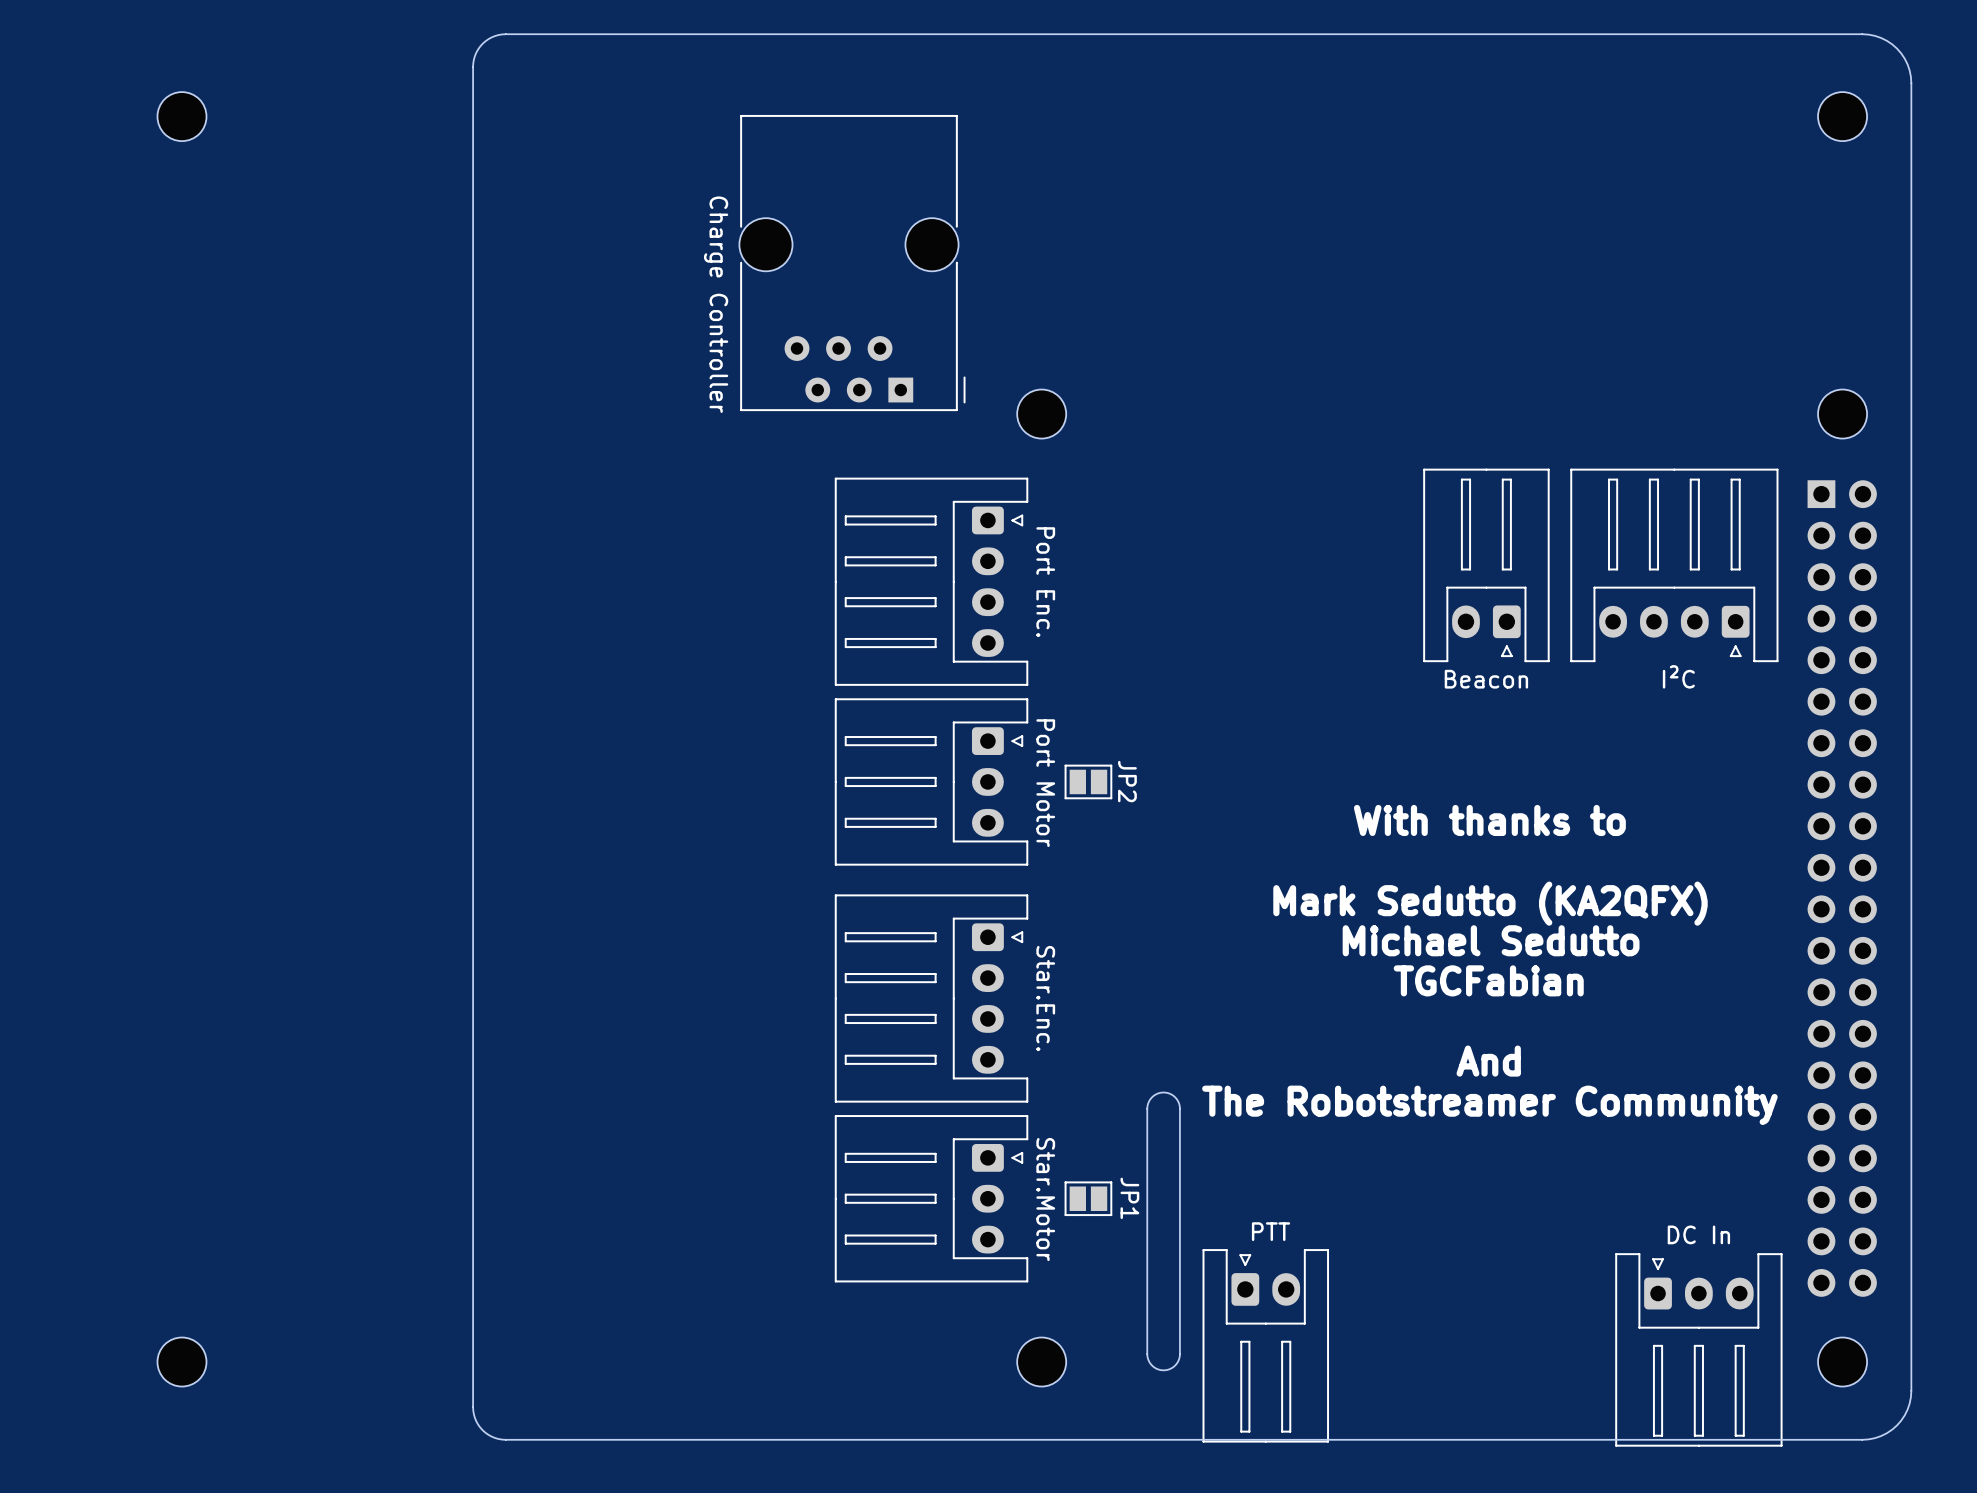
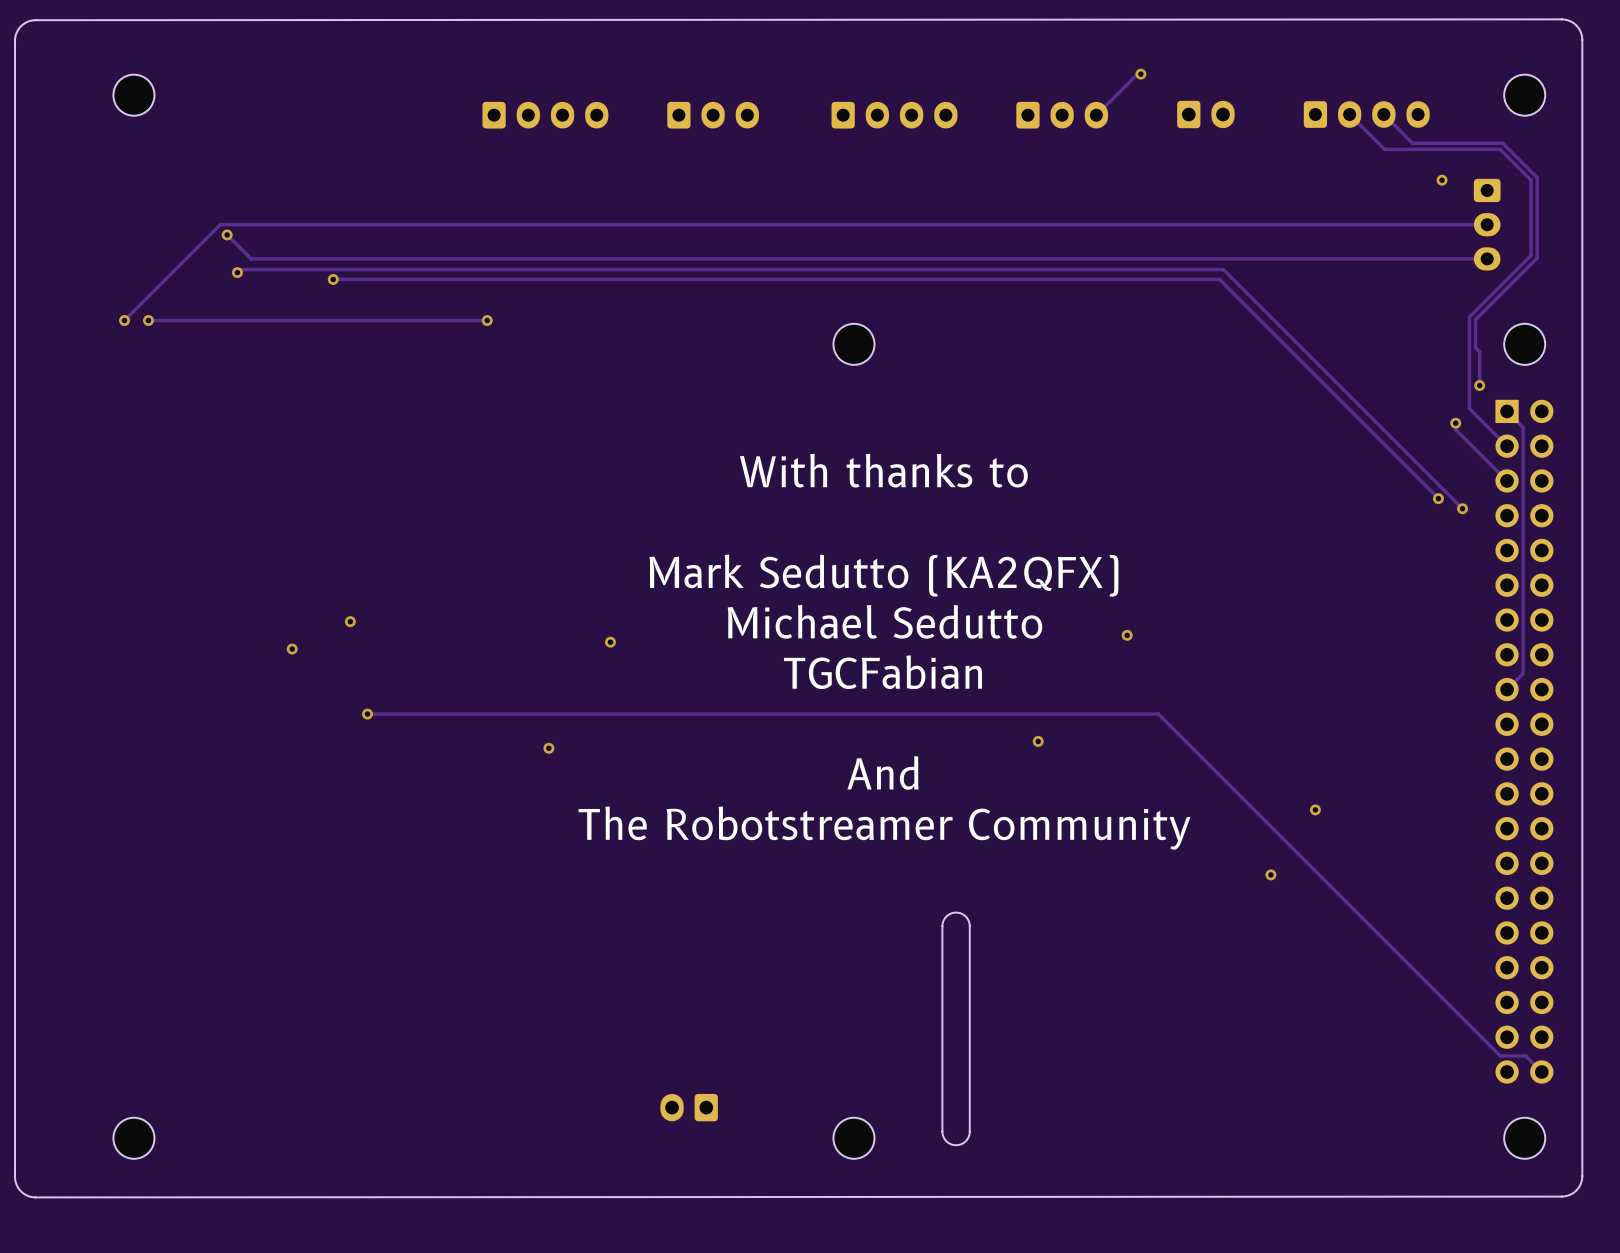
board edge: (1911, 83) (1907, 64) (1896, 48) (1881, 37) (1862, 34) (505, 34) (491, 37) (482, 43) (474, 56) (473, 66) (473, 1407) (474, 1417) (482, 1430) (491, 1436) (505, 1439) (1862, 1439) (1881, 1436) (1896, 1425) (1907, 1409) (1911, 1390) -> (1582, 67) (1580, 32) (1572, 22) (1561, 19) (35, 20) (27, 21) (21, 26) (16, 32) (15, 40) (15, 1176) (17, 1187) (23, 1193) (35, 1197) (1561, 1196) (1572, 1193) (1579, 1186) (1582, 1178) (1582, 1162)
track: none -> (1140, 74) (1137, 74) (1096, 115)
via: none -> (1140, 74)
part: none -> (1205, 114)
track: none -> (1349, 114) (1384, 149) (1500, 149) (1531, 180) (1531, 255) (1469, 317) (1469, 408) (1507, 446)
part: none -> (1366, 114)
track: none -> (1383, 114) (1412, 143) (1502, 143) (1537, 177) (1537, 258) (1475, 319) (1475, 347) (1479, 351) (1479, 385)
part: none -> (545, 115)
part: none -> (713, 115)
part: none -> (894, 115)
part: none -> (1062, 115)
via: none -> (1442, 180)
part: Charge Controller (852, 263) -> none
track: none -> (1487, 224) (220, 224) (124, 320)
part: none -> (1487, 224)
track: none -> (227, 234) (251, 258) (1487, 258)
via: none -> (227, 234)
track: none -> (237, 272) (240, 269) (1223, 269) (1462, 508)
via: none -> (237, 272)
track: none -> (333, 279) (1219, 279) (1438, 498)
via: none -> (333, 279)
via: none -> (124, 320)
via: none -> (148, 320)
track: none -> (487, 320) (148, 320)
via: none -> (487, 320)
via: none -> (1479, 385)
track: none -> (1507, 411) (1523, 427) (1523, 673) (1507, 689)
track: none -> (1455, 423) (1455, 429) (1507, 480)
via: none -> (1455, 423)
text: none -> With thanks to (883, 470)
part: Beacon (1486, 565) -> none
part: I²C (1674, 565) -> none
part: Port Enc. (931, 581) -> none
via: none -> (1438, 498)
via: none -> (1462, 508)
text: none -> Mark Sedutto (KA2QFX) (883, 575)
via: none -> (350, 621)
text: none -> Michael Sedutto (884, 621)
via: none -> (1127, 635)
via: none -> (610, 642)
via: none -> (292, 649)
part: Port Motor (931, 781) -> none
JP2: (1088, 781) -> none
text: none -> TGCFabian (882, 672)
text: With thanks to (1489, 820) -> none
track: none -> (367, 714) (1158, 714) (1500, 1055) (1525, 1055) (1541, 1072)
via: none -> (367, 714)
via: none -> (1038, 741)
via: none -> (548, 748)
text: Mark Sedutto (KA2QFX) (1490, 903) -> none
text: none -> And (883, 772)
text: Michael Sedutto (1491, 940) -> none
via: none -> (1315, 809)
text: TGCFabian (1488, 980) -> none
text: none -> The Robotstreamer Community (884, 828)
part: Star.Enc. (931, 998) -> none
via: none -> (1270, 874)
text: And (1488, 1061) -> none
text: The Robotstreamer Community (1489, 1105) -> none
part: Star.Motor (931, 1198) -> none
JP1: (1088, 1198) -> none
part: none -> (689, 1107)
part: PTT (1265, 1345) -> none
part: DC In (1698, 1349) -> none

